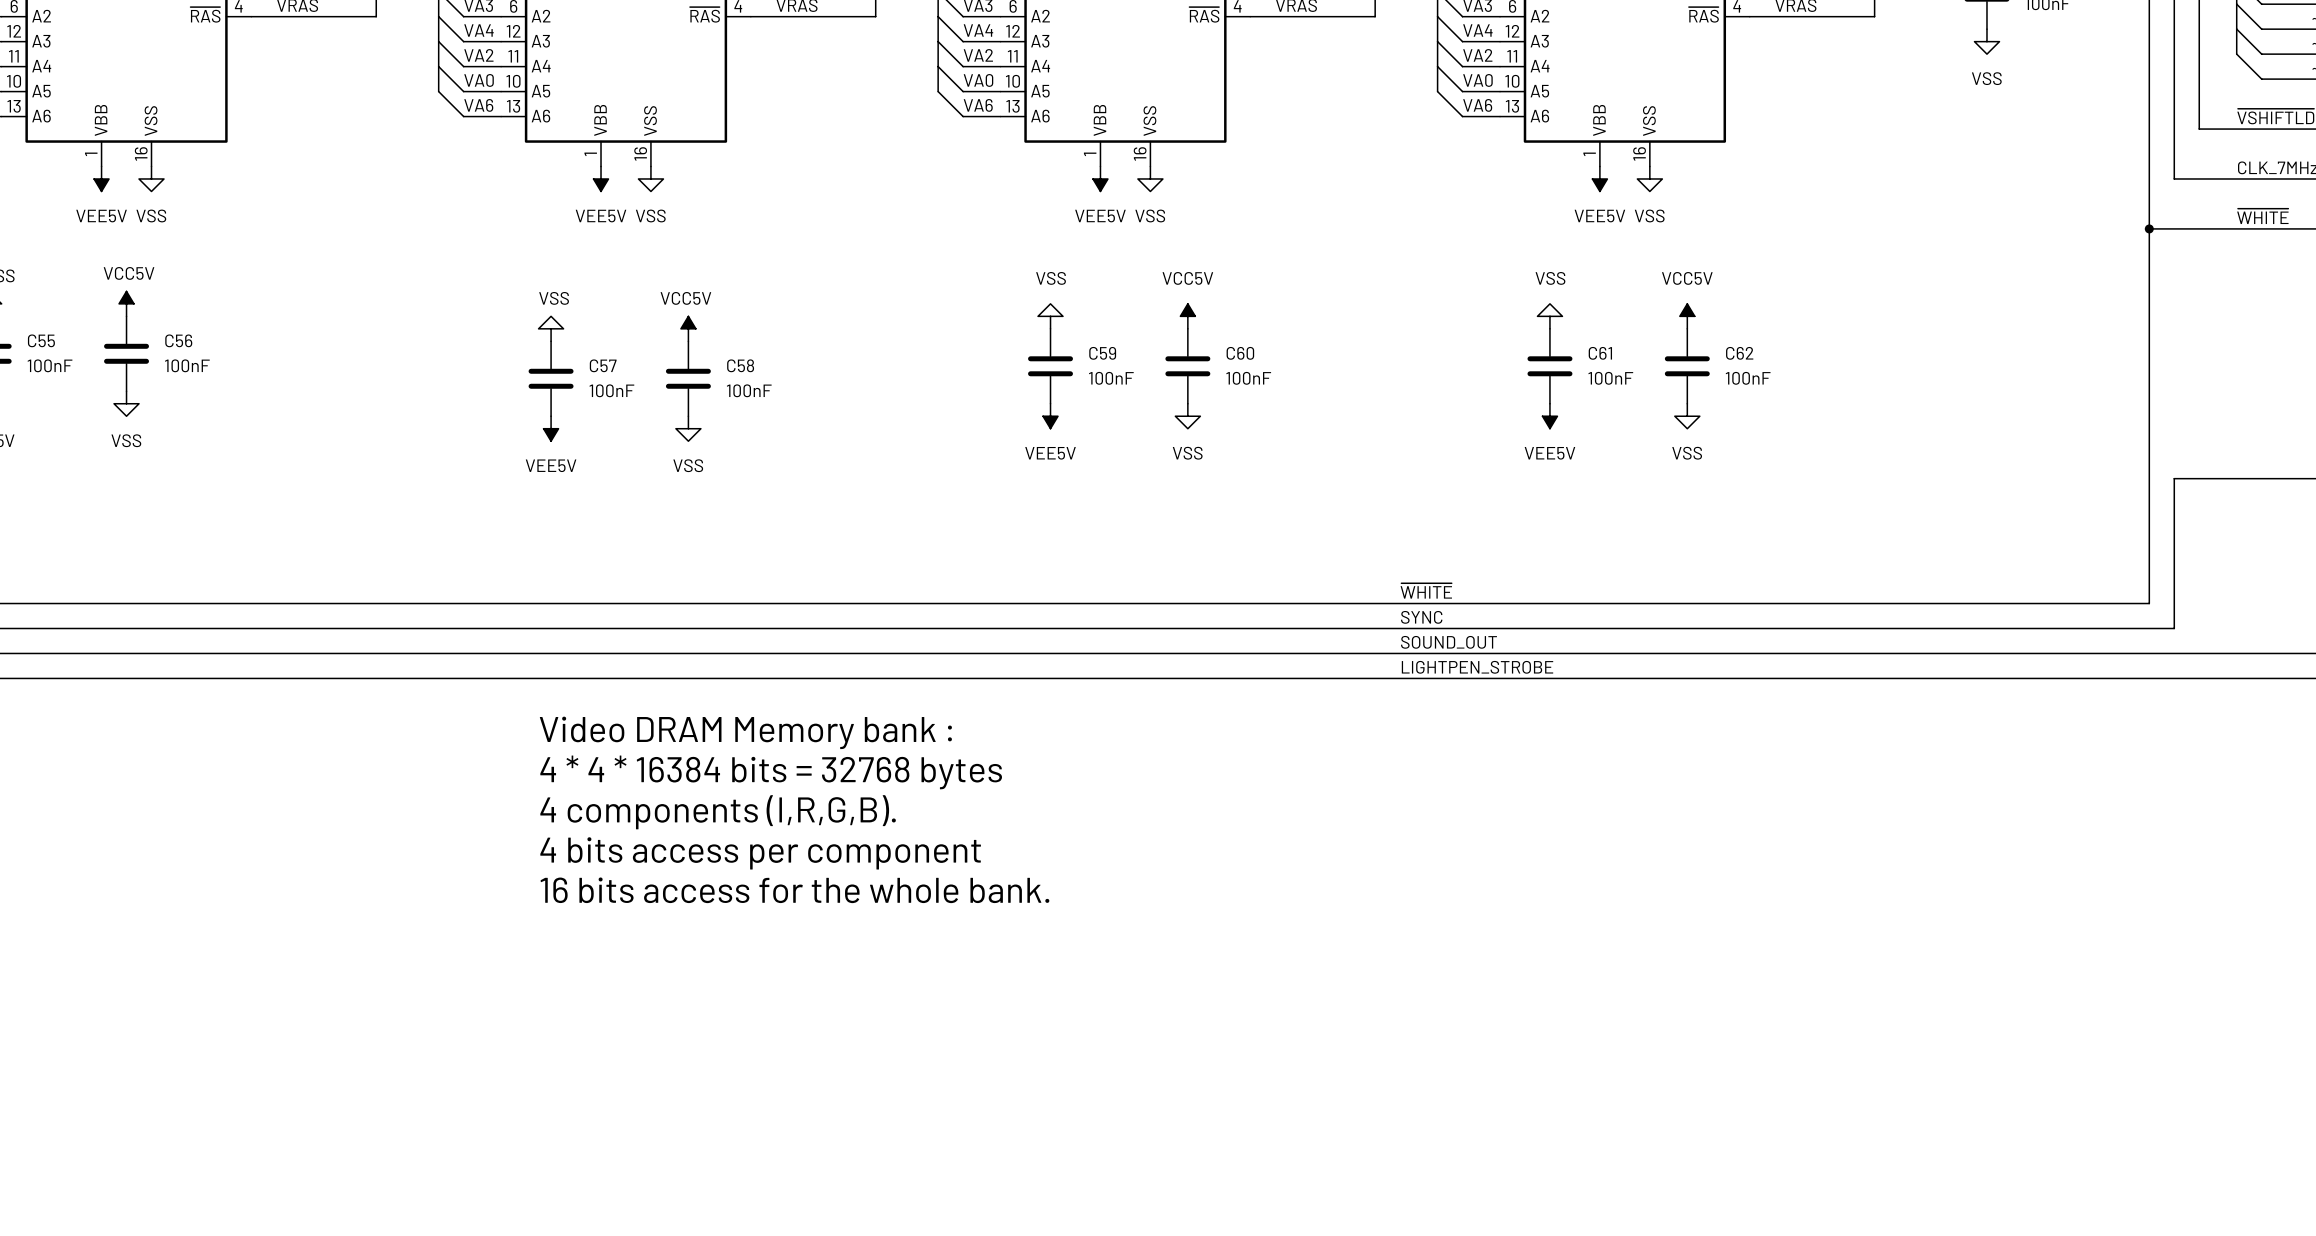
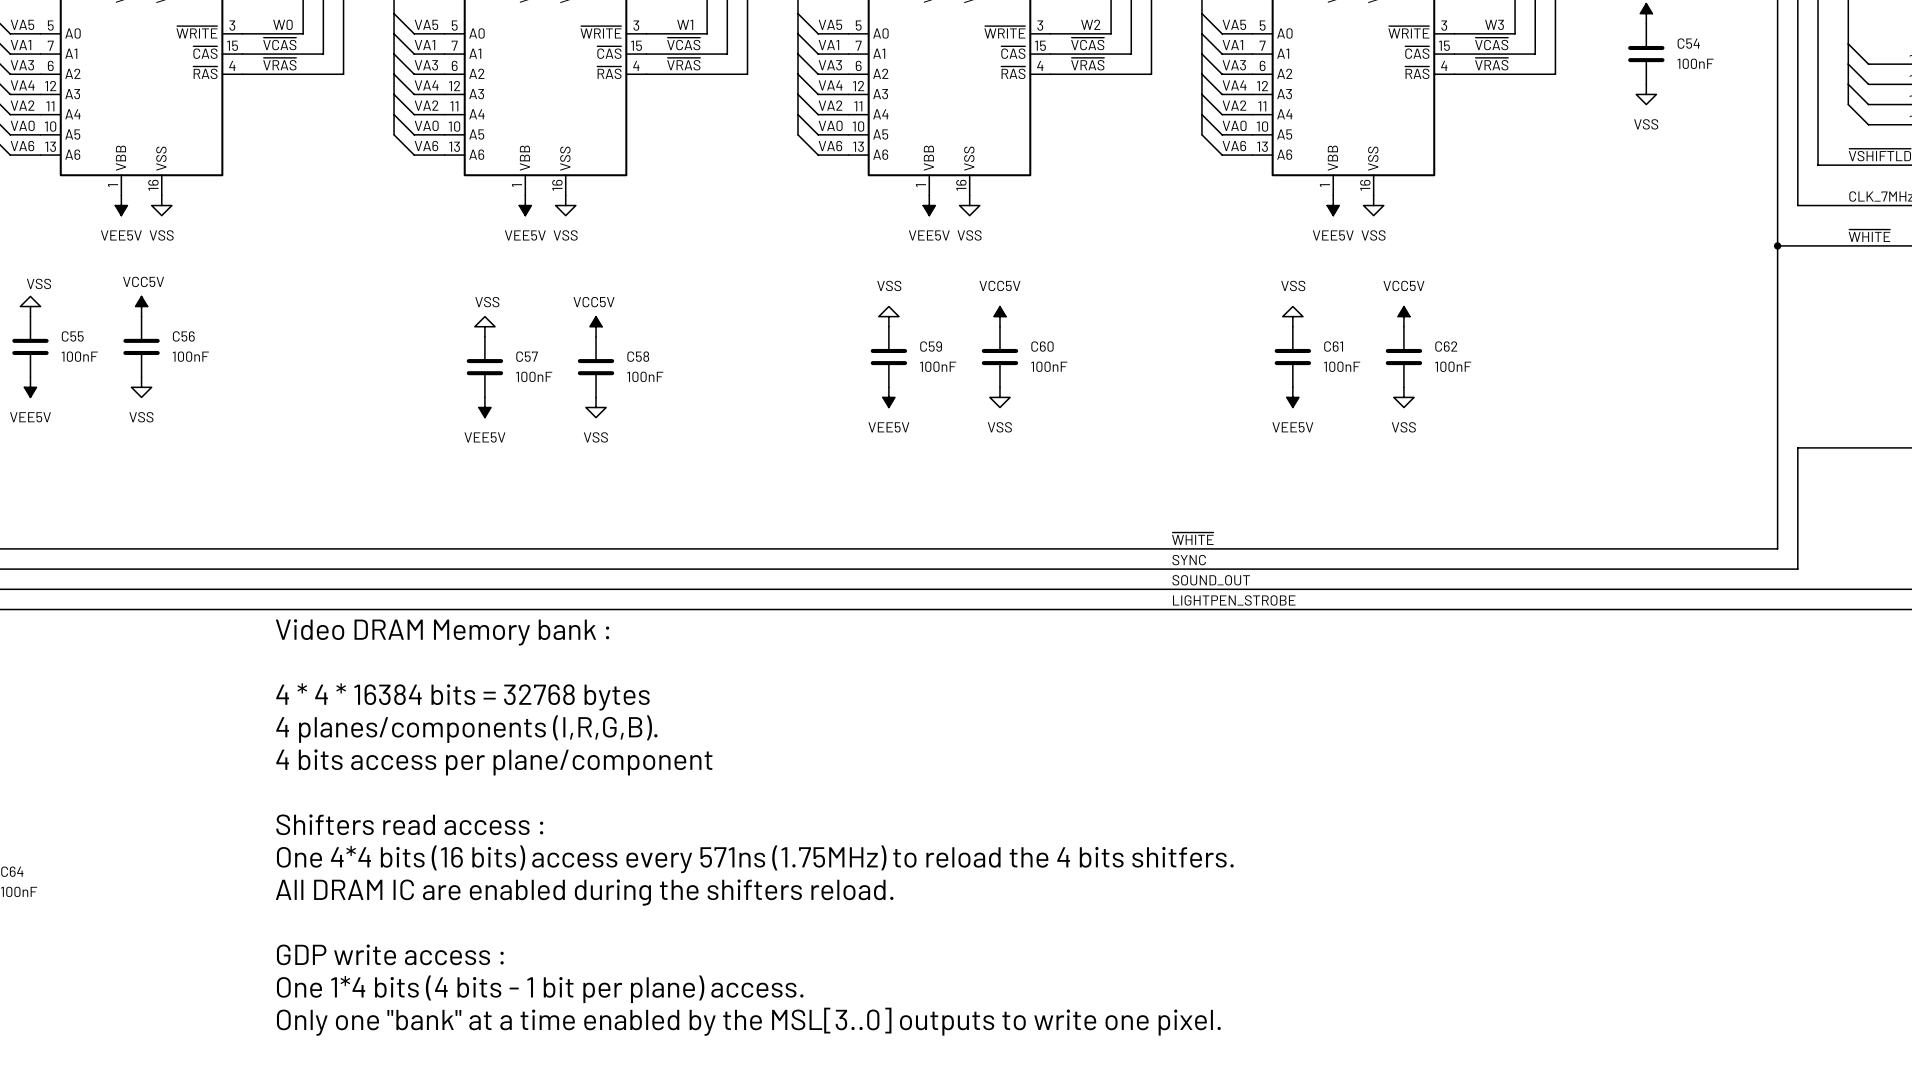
text: none -> Video DRAM Memory bank : (442, 632)
text: Video DRAM Memory bank : (745, 732) -> none
text: 4 * 4 * 16384 bits = 32768 bytes (771, 772) -> none
text: none -> 4 * 4 * 16384 bits = 32768 bytes (462, 696)
text: 4 components (I,R,G,B). (718, 812) -> none
text: none -> 4 planes/components (I,R,G,B). (466, 729)
text: 4 bits access per component (760, 853) -> none
text: none -> 4 bits access per plane/component (494, 762)
text: 16 bits access for the whole bank. (794, 890) -> none
text: none -> Shifters read access : (409, 824)
text: none -> One 4*4 bits (16 bits) access every 571ns (1.75MHz) to reload the 4 bits shitfers. (755, 859)
text: none -> All DRAM IC are enabled during the shifters reload. (584, 892)
text: none -> GDP write access : (390, 954)
text: none -> One 1*4 bits (4 bits - 1 bit per plane) access. (540, 989)
text: none -> Only one "bank" at a time enabled by the MSL[3..0] outputs to write one pixel. (748, 1021)

